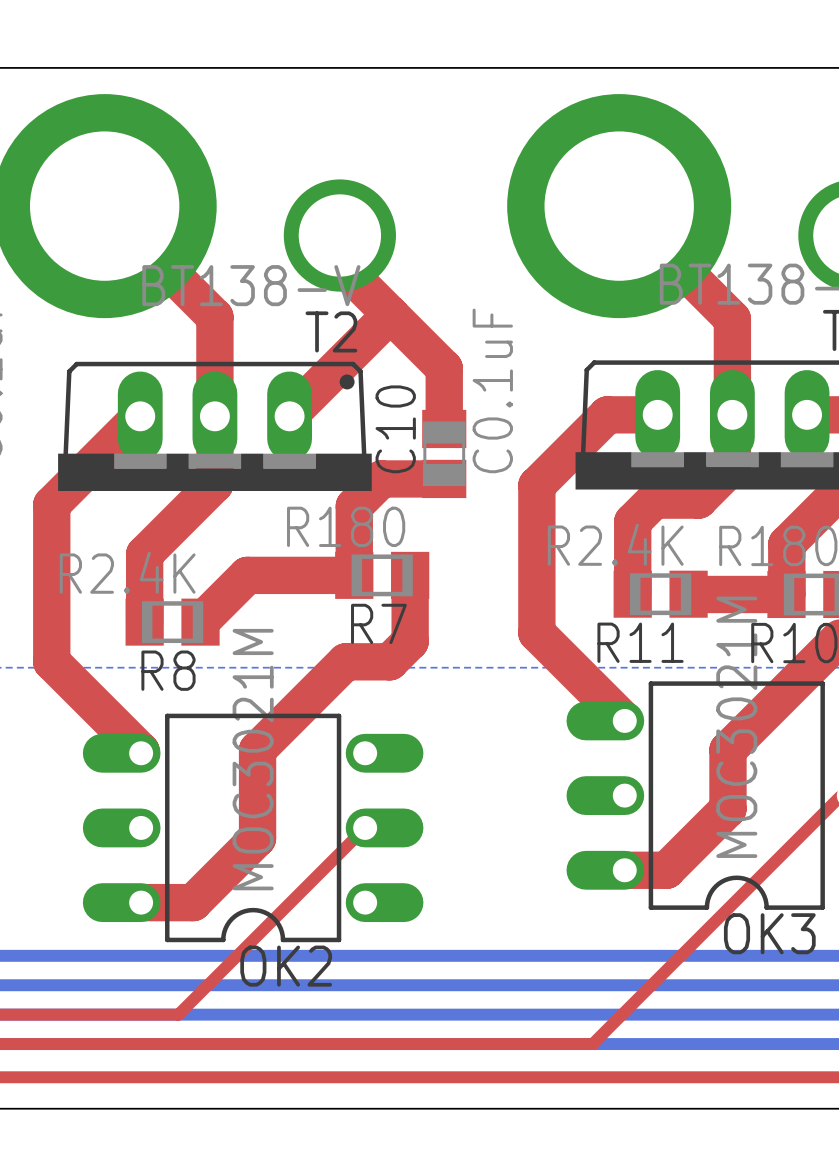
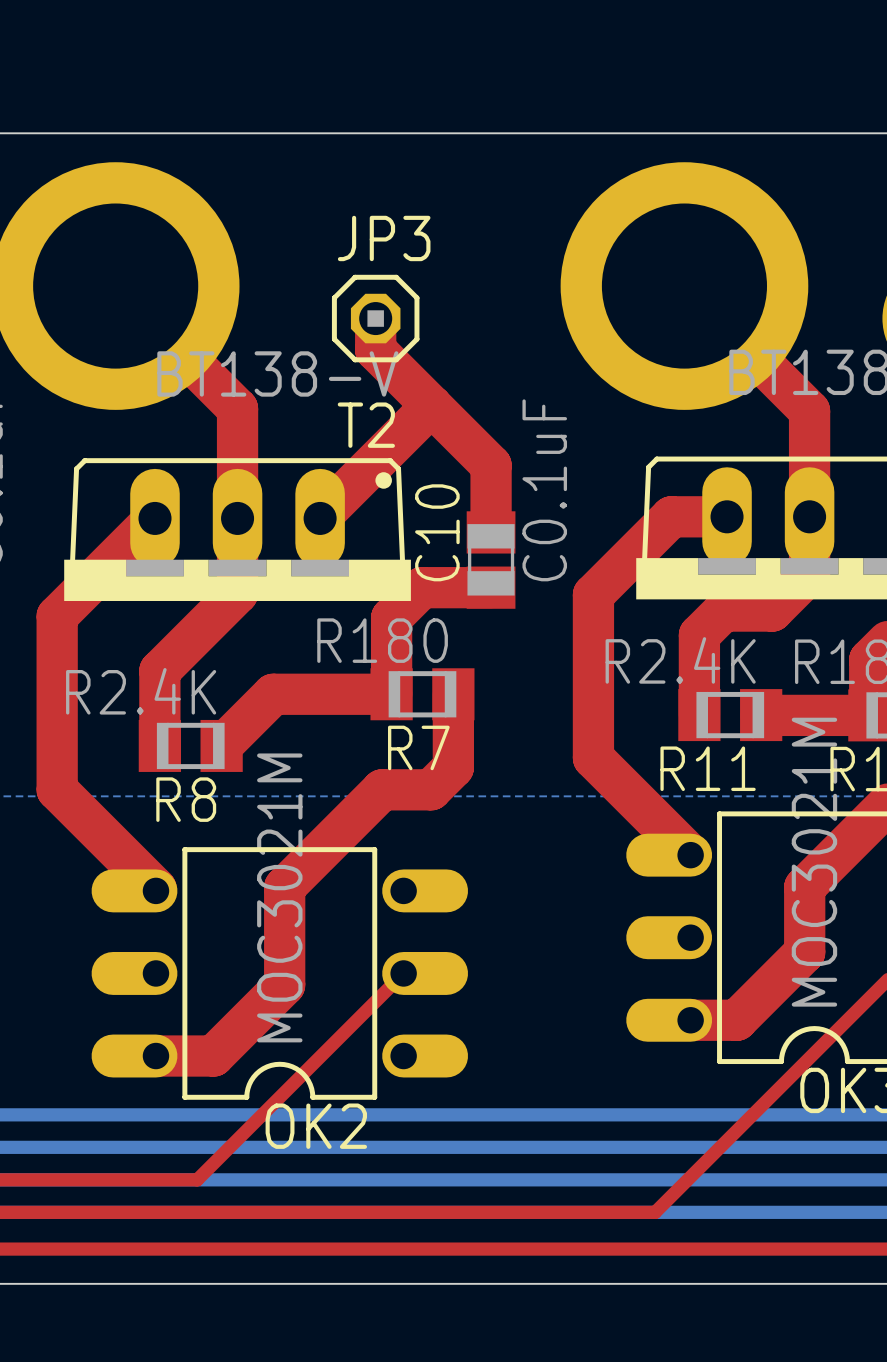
part: (339, 235) -> none
JP3: none -> (375, 318)

